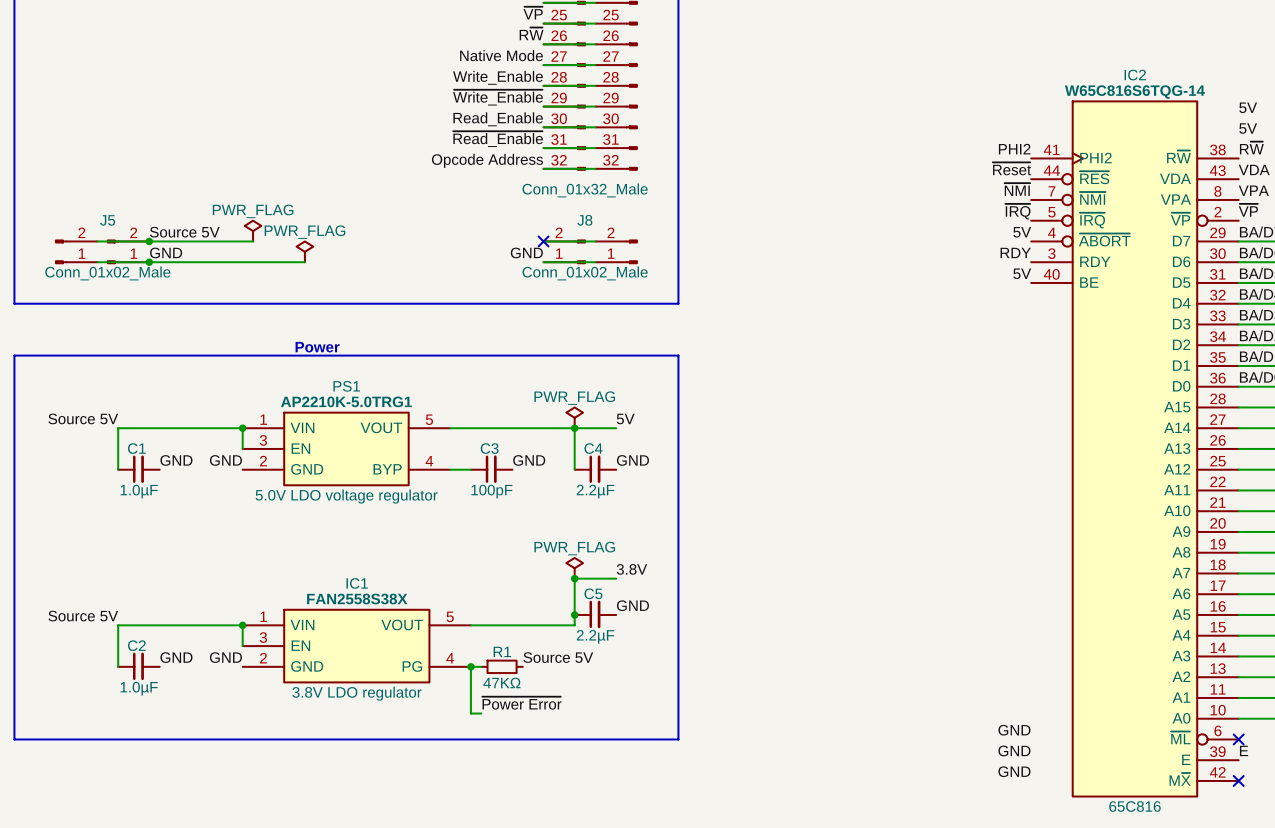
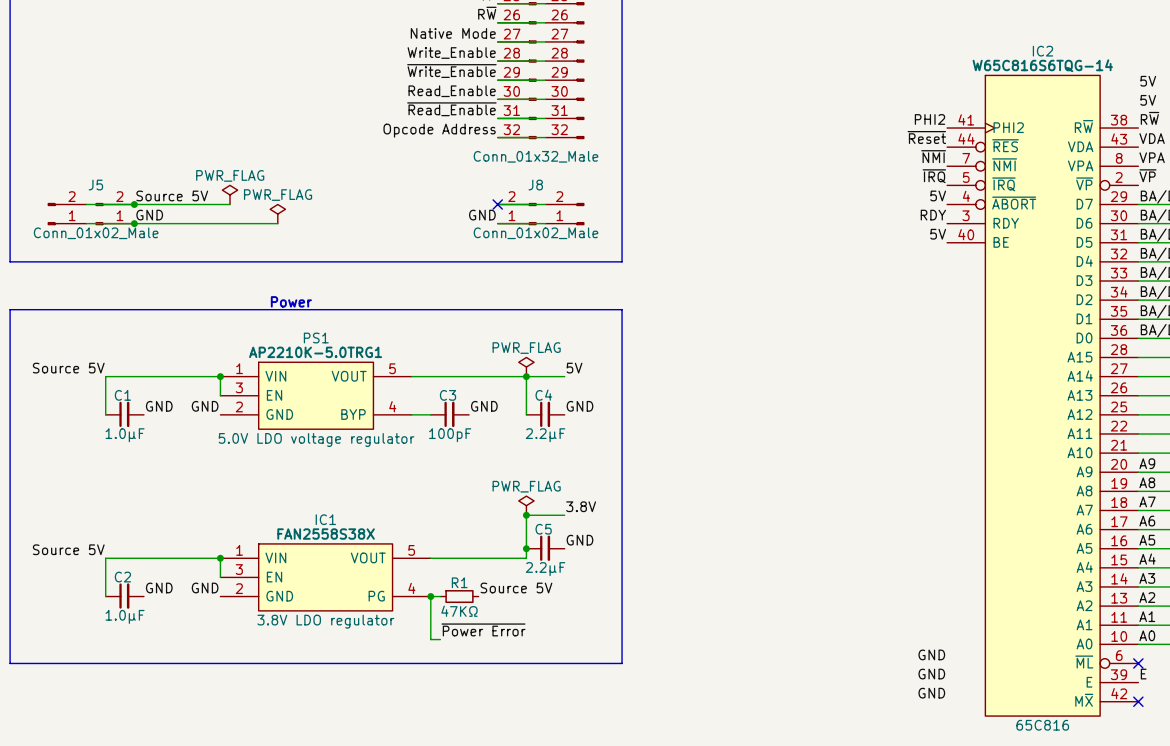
label: none -> A9 (1147, 463)
label: none -> A8 (1147, 482)
label: none -> A7 (1147, 501)
label: none -> A6 (1147, 521)
label: none -> A5 (1147, 540)
label: none -> A4 (1147, 559)
label: none -> A3 (1147, 578)
label: none -> A2 (1147, 597)
label: none -> A1 (1147, 616)
label: none -> A0 (1147, 635)

